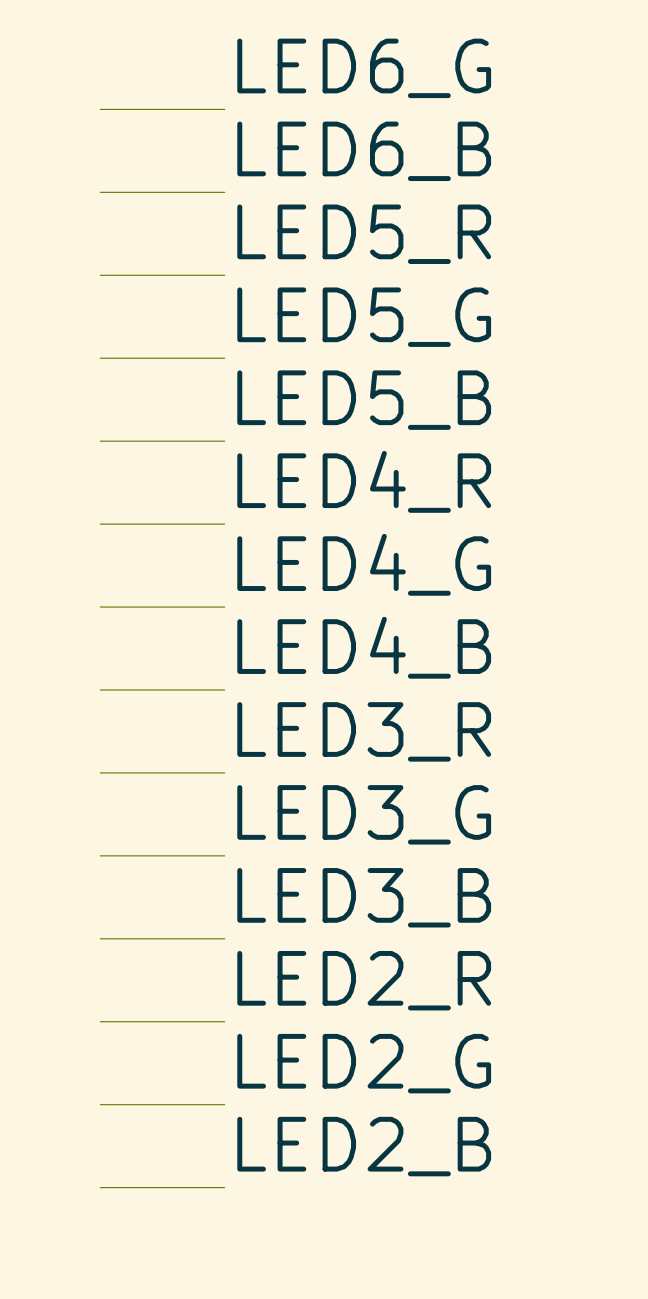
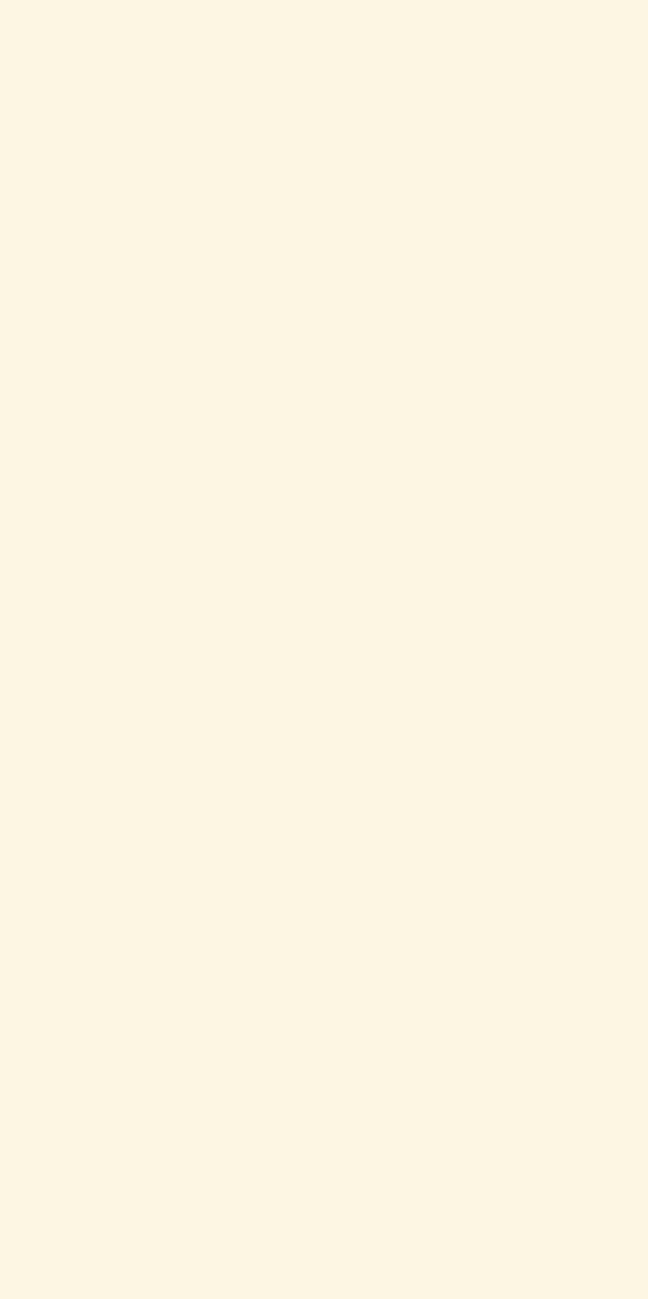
label: LED6_G (364, 68) -> none
wire: (100, 109) (224, 109) -> none
label: LED6_B (364, 151) -> none
wire: (100, 192) (224, 192) -> none
label: LED5_R (364, 234) -> none
wire: (100, 275) (224, 275) -> none
label: LED5_G (364, 317) -> none
wire: (100, 358) (224, 358) -> none
label: LED5_B (364, 400) -> none
wire: (100, 441) (224, 441) -> none
label: LED4_R (364, 481) -> none
wire: (100, 524) (224, 524) -> none
label: LED4_G (364, 564) -> none
wire: (100, 607) (224, 607) -> none
label: LED4_B (364, 647) -> none
wire: (100, 689) (224, 689) -> none
label: LED3_R (364, 731) -> none
wire: (100, 772) (224, 772) -> none
label: LED3_G (364, 814) -> none
wire: (100, 855) (224, 855) -> none
label: LED3_B (364, 897) -> none
wire: (100, 938) (224, 938) -> none
label: LED2_R (364, 980) -> none
wire: (100, 1021) (224, 1021) -> none
label: LED2_G (364, 1063) -> none
wire: (100, 1104) (224, 1104) -> none
label: LED2_B (364, 1146) -> none
wire: (100, 1187) (224, 1187) -> none

